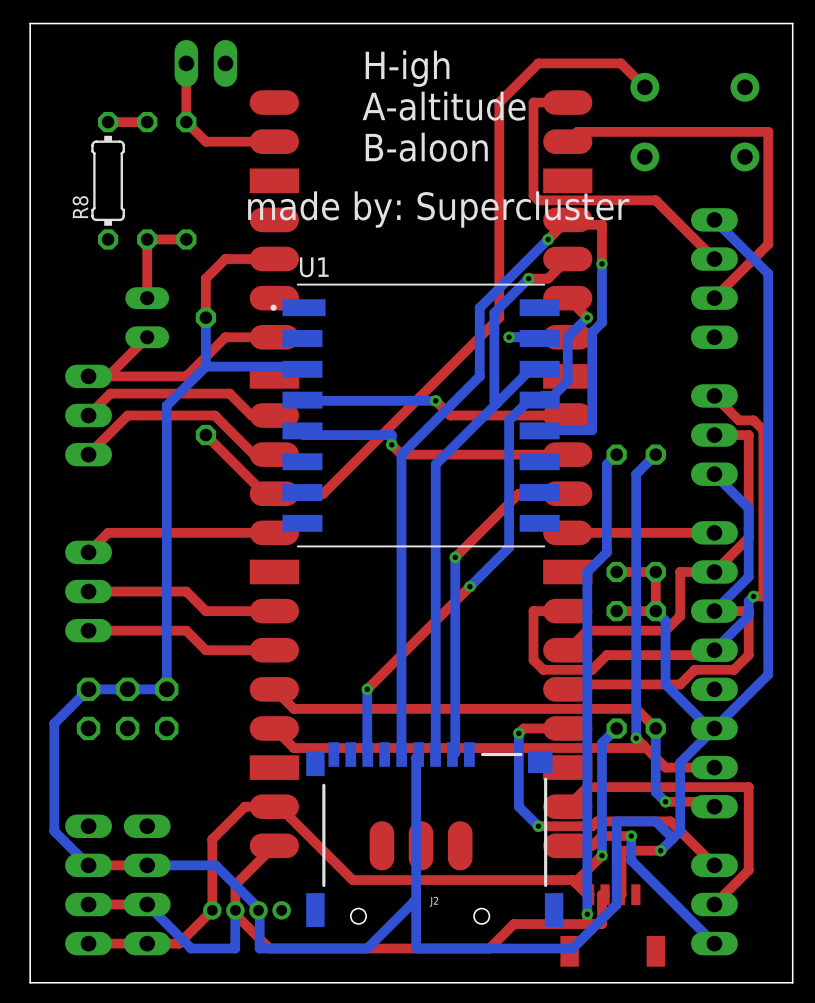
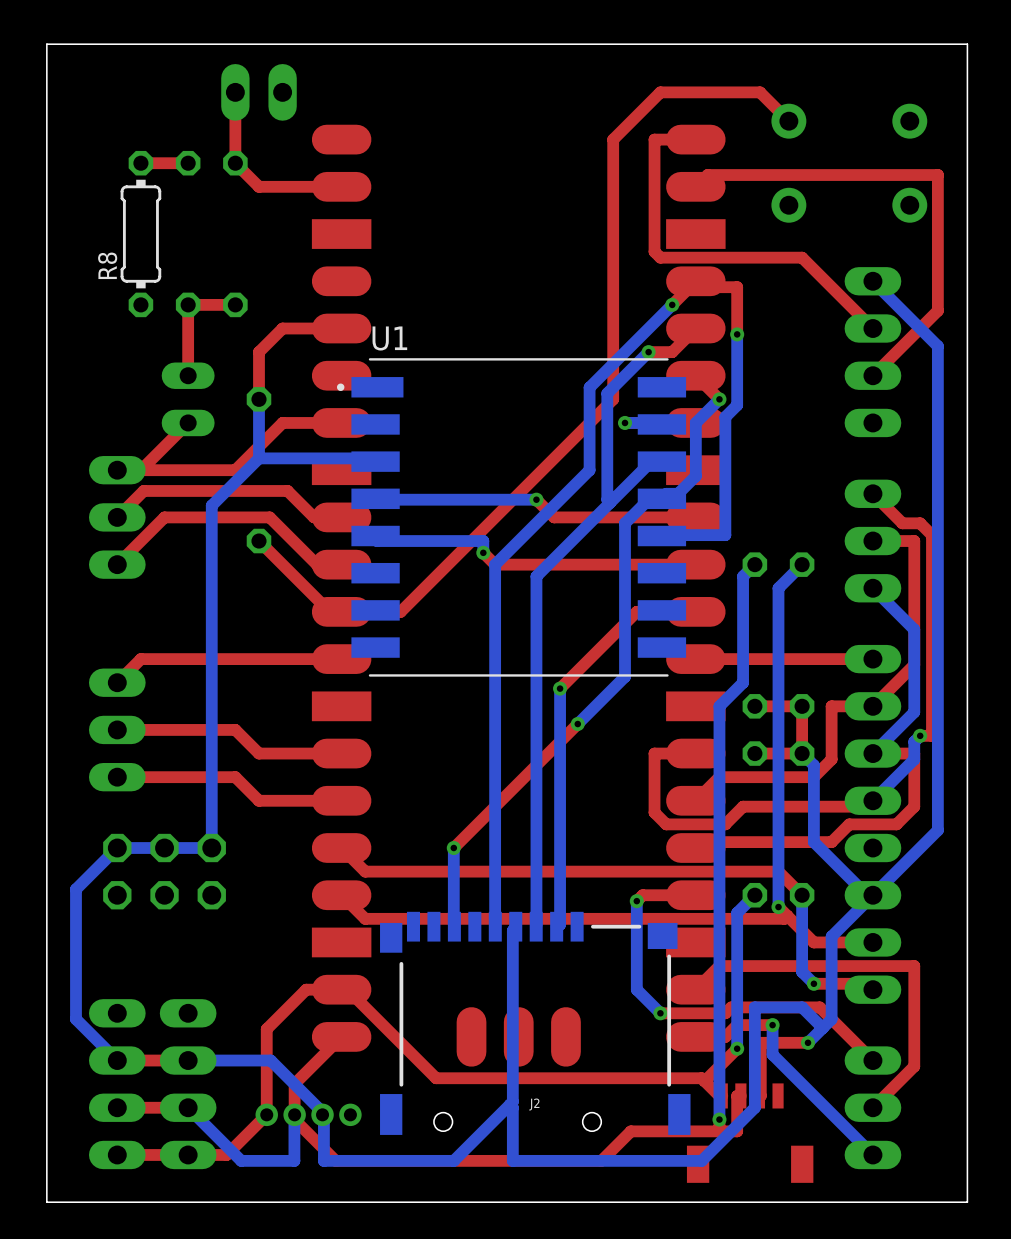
text: H-igh (407, 68) -> none
text: A-altitude (444, 106) -> none
text: B-aloon (426, 147) -> none
text: made by: Supercluster (438, 209) -> none

